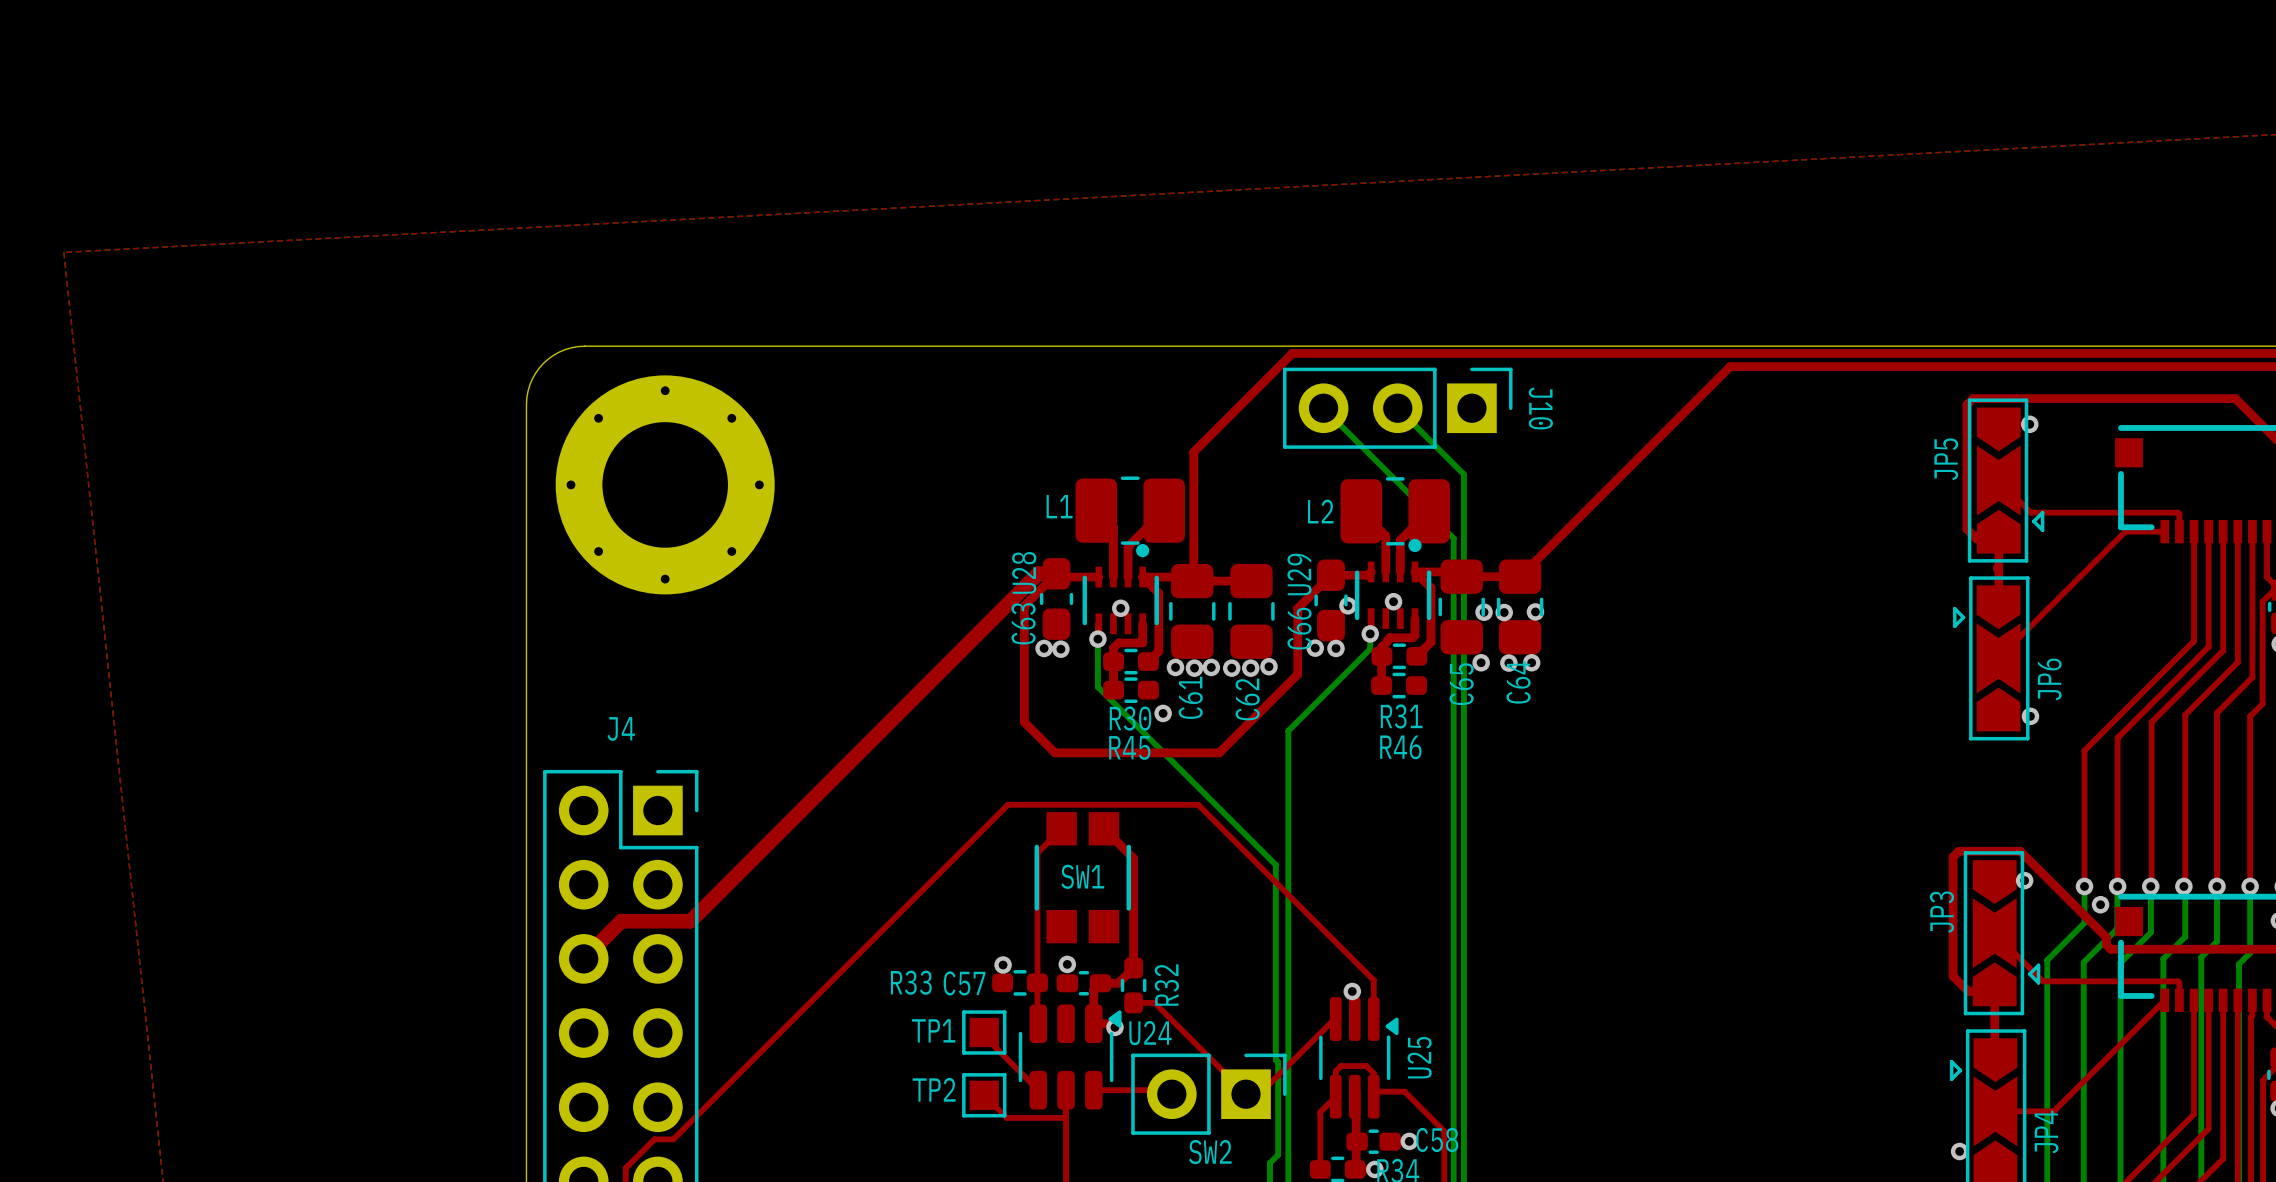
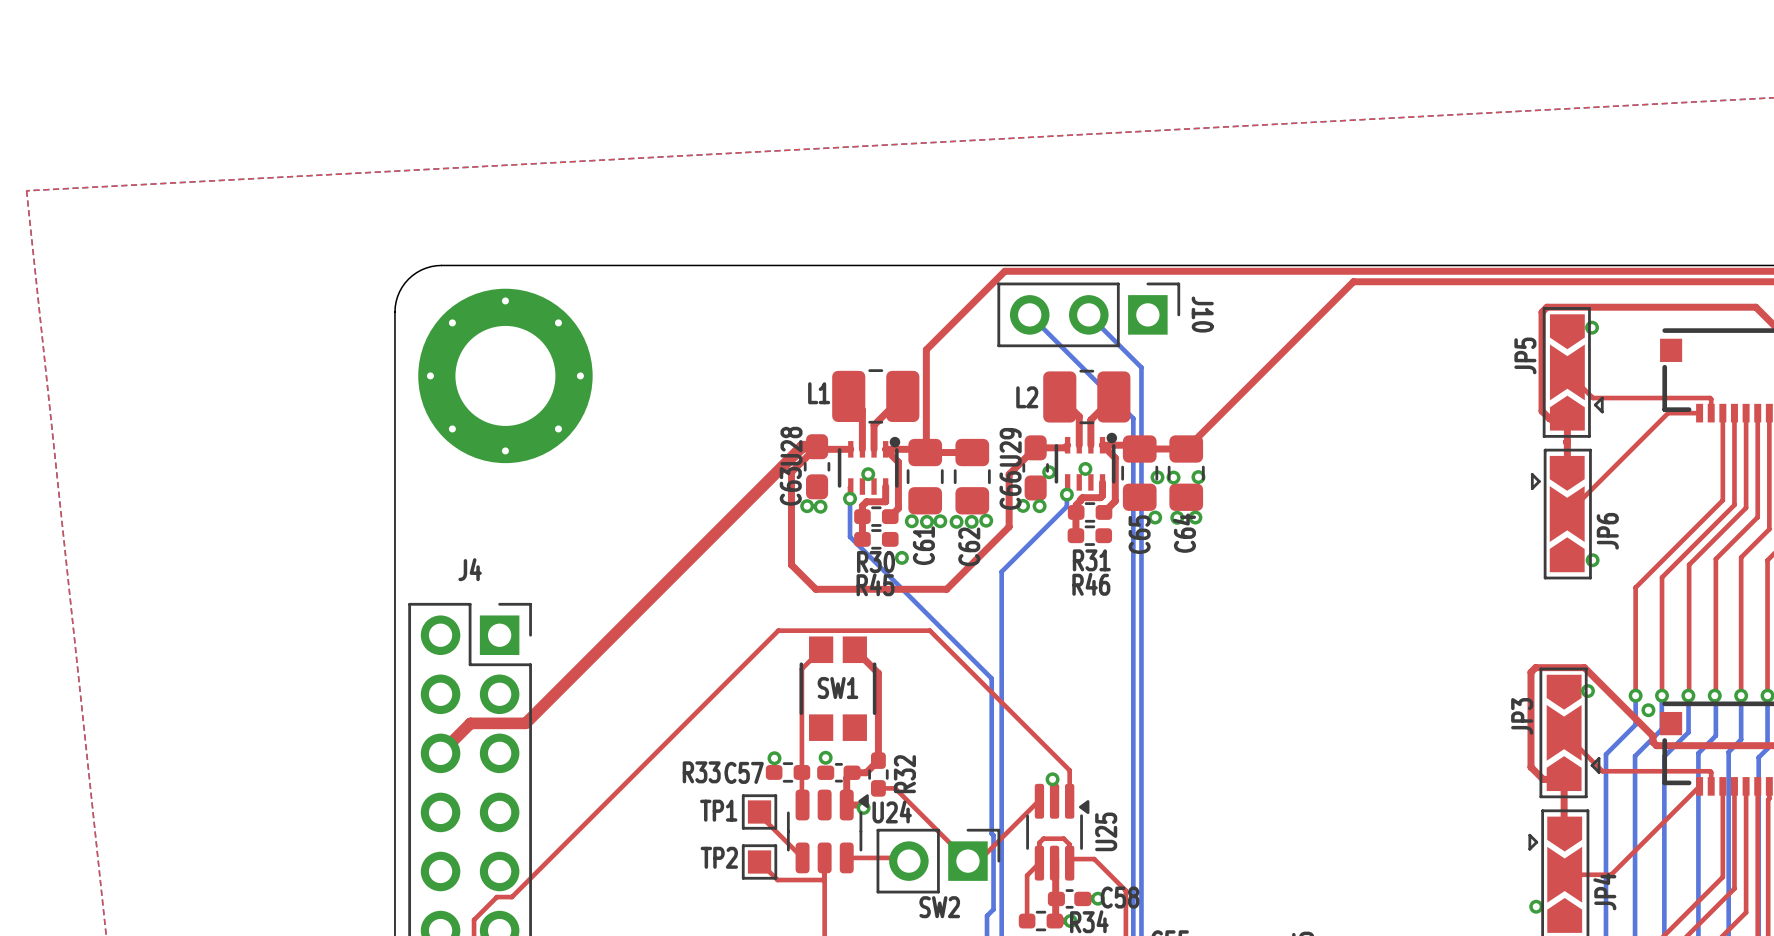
U29 footprint: [1354, 538, 1432, 630] -> [1054, 432, 1118, 491]
U28 footprint: [1082, 544, 1159, 635] -> [837, 436, 901, 495]

